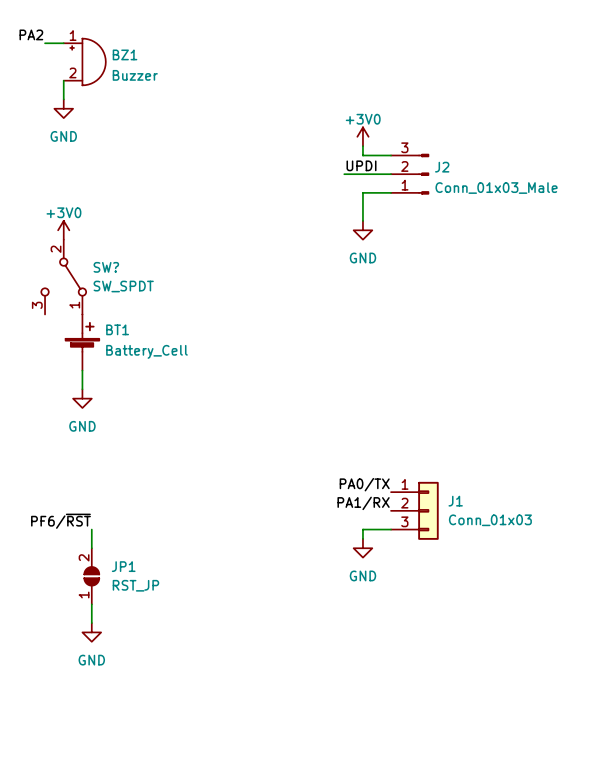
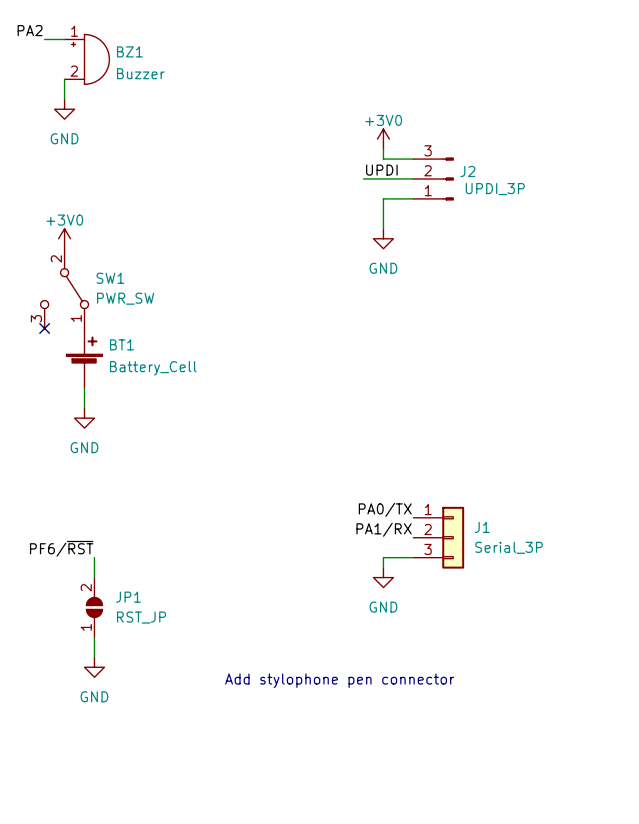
J2 value: Conn_01x03_Male (496, 188) -> UPDI_3P (495, 189)
SW? name: SW? (106, 267) -> SW1 (110, 278)
SW? value: SW_SPDT (123, 286) -> PWR_SW (125, 298)
no-connect mark: none -> (44, 328)
J1 value: Conn_01x03 (490, 520) -> Serial_3P (509, 547)
text: none -> Add stylophone pen connector (339, 680)

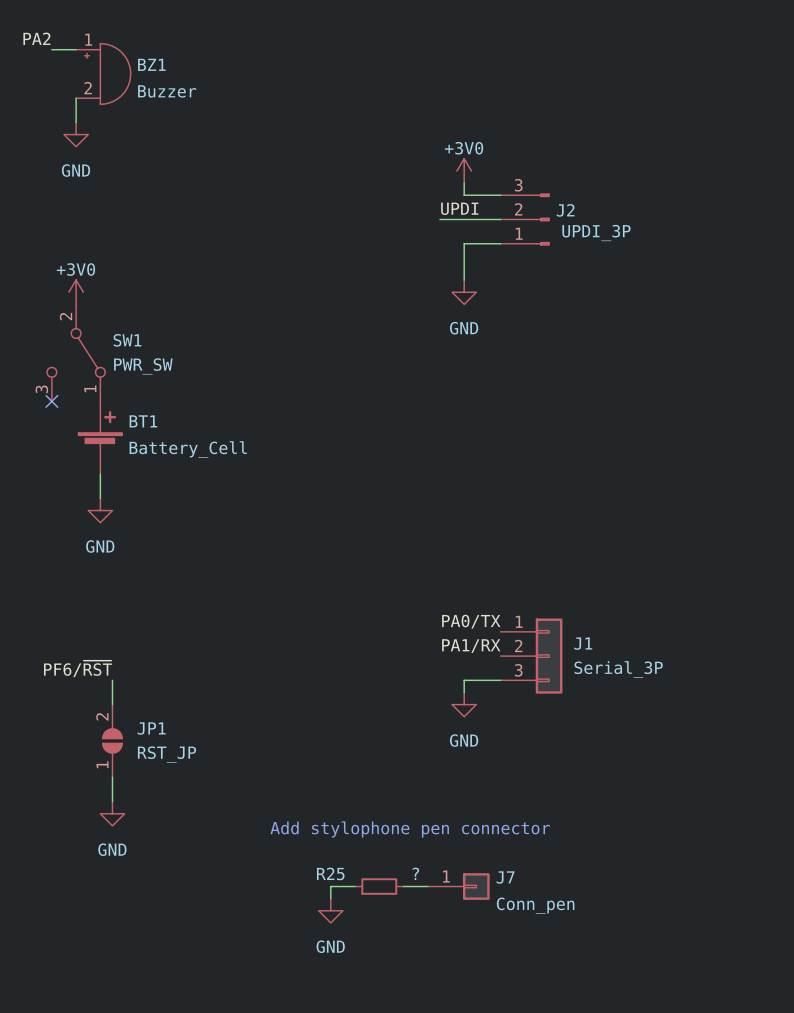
wire: none -> (355, 886) (330, 886) (330, 898)
R25: none -> ? (379, 886)
wire: none -> (403, 886) (427, 886)
J7: none -> Conn_pen (458, 886)
power symbol: none -> GND (330, 910)

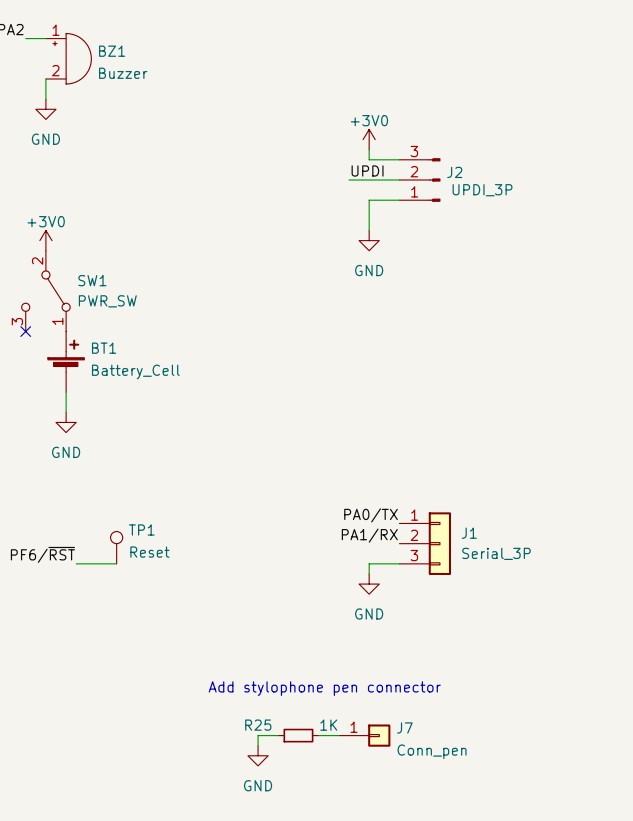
TP1: none -> Reset (116, 547)
wire: (112, 680) (112, 704) -> (76, 563) (116, 563)
JP1: RST_JP (112, 740) -> none
wire: (112, 777) (112, 801) -> none
power symbol: GND (112, 813) -> none
R25 value: ? (415, 873) -> 1K (328, 725)

